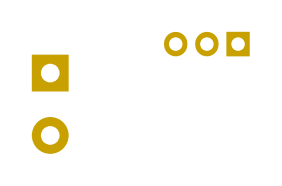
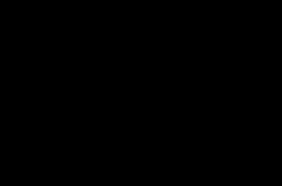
part: (206, 44) -> none
part: (50, 104) -> none

